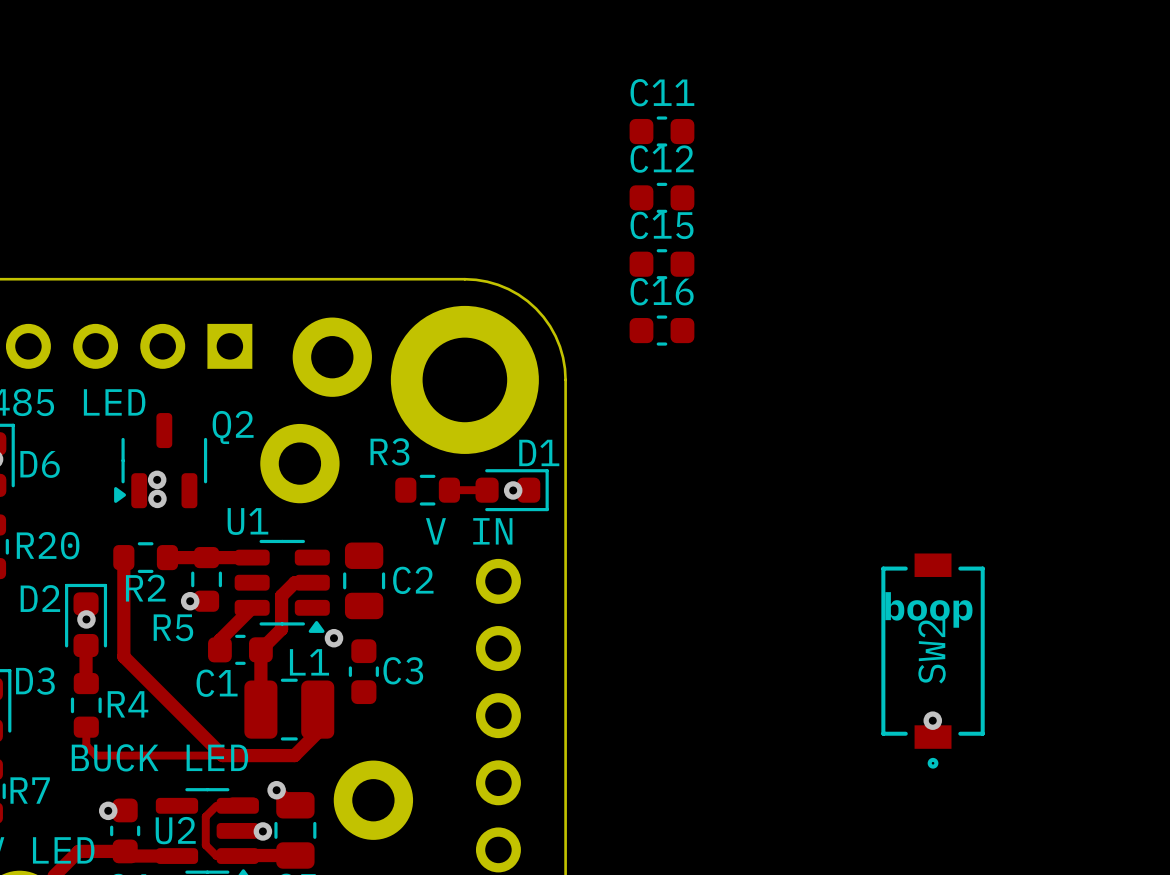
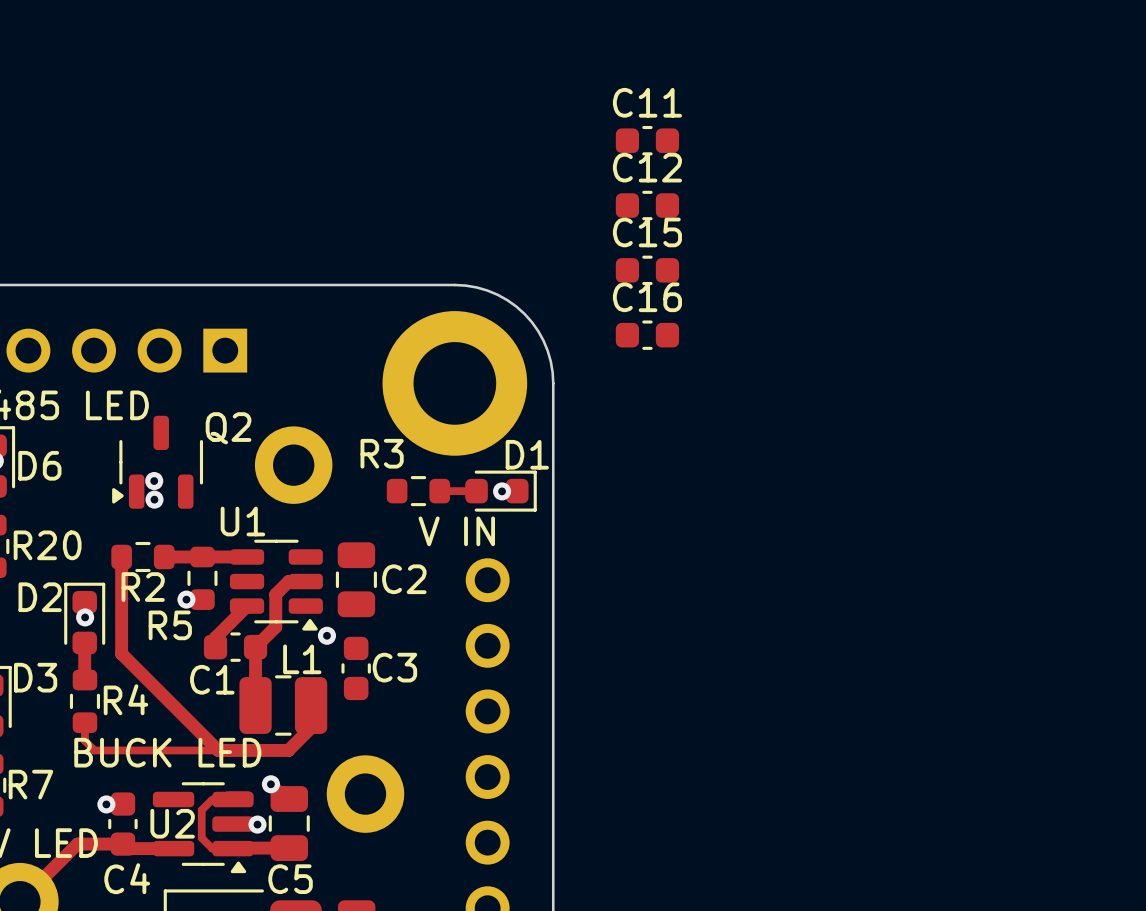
part: (332, 357) -> none
text: boop (928, 609) -> none
SW2: (933, 661) -> none
via: (932, 720) -> none

